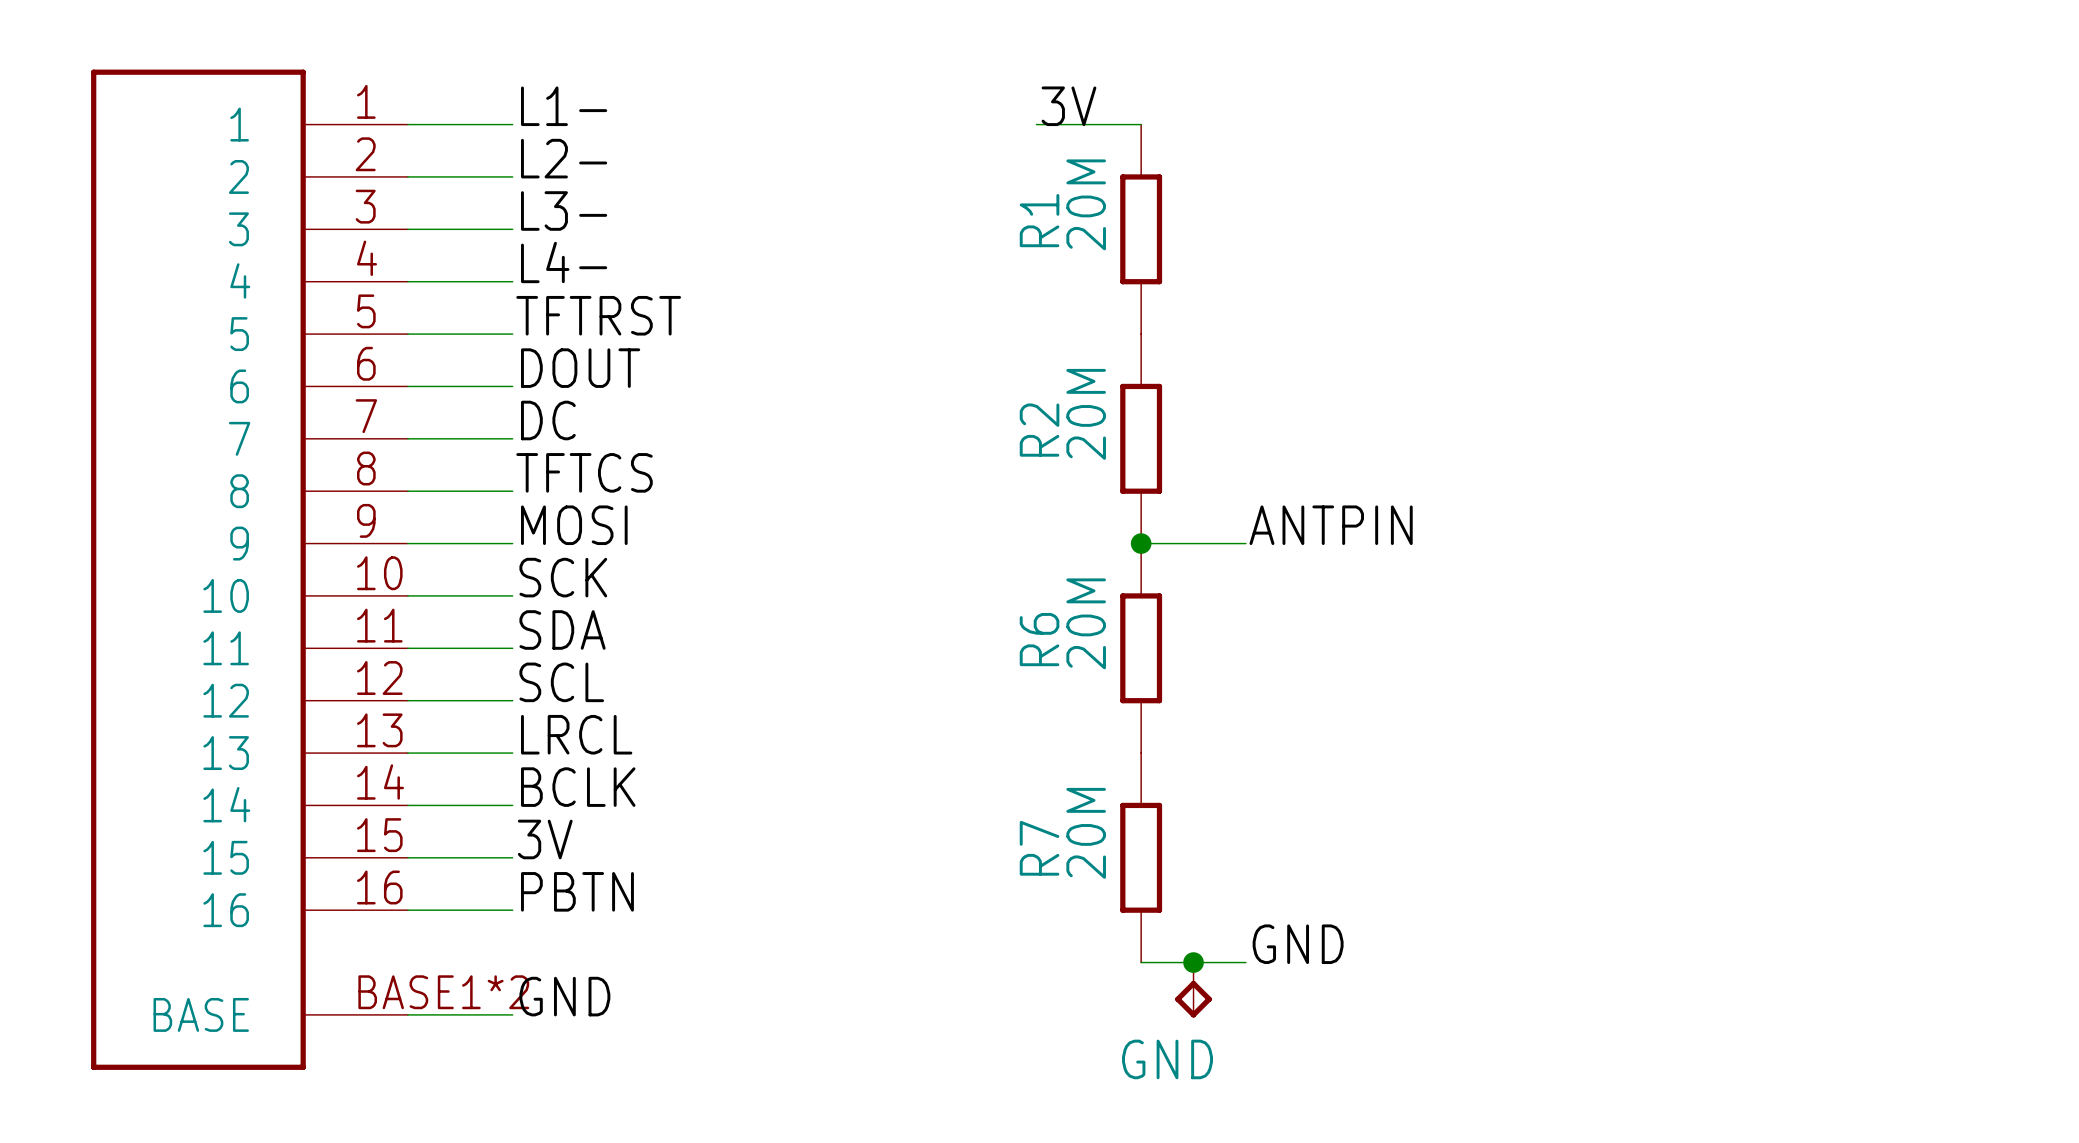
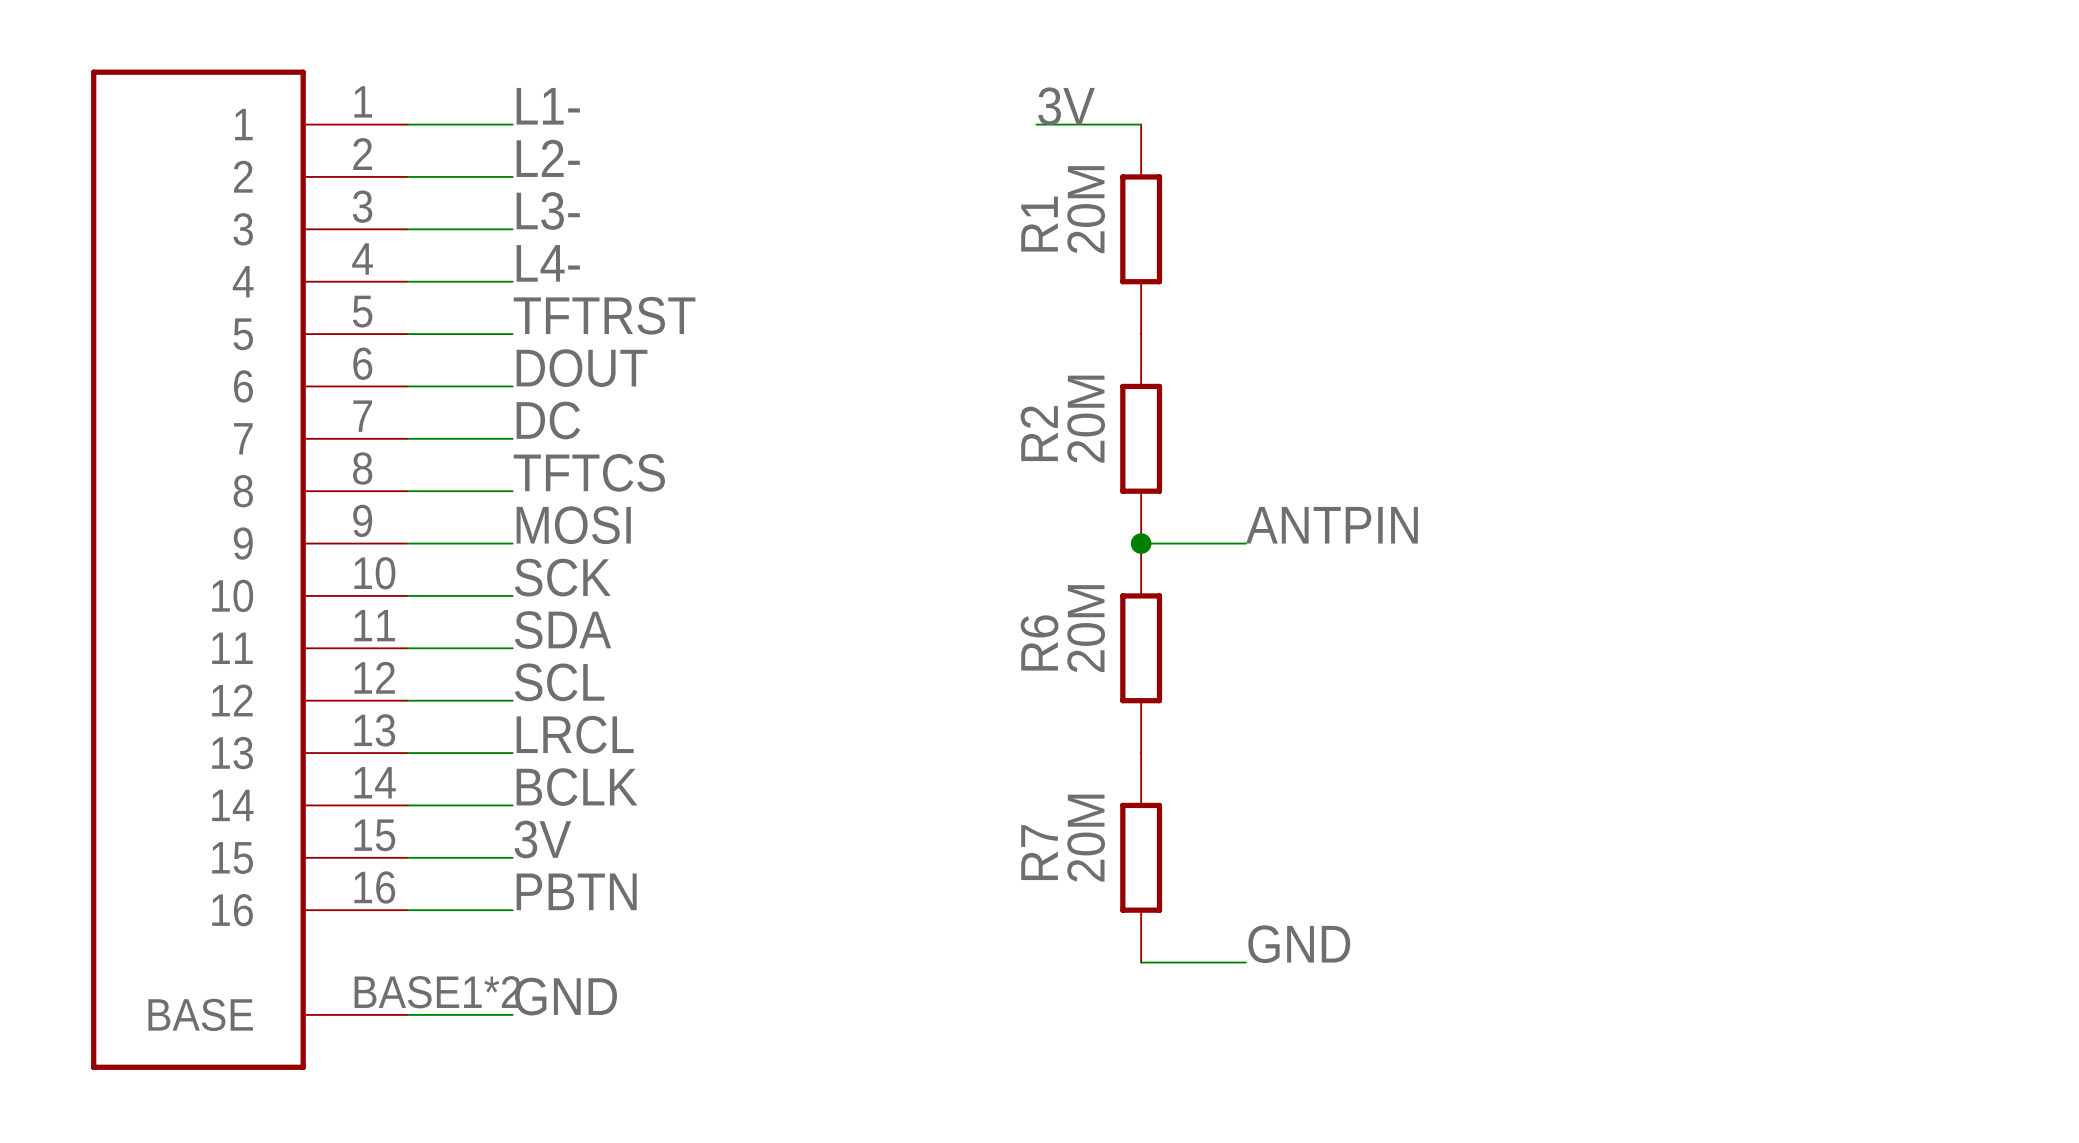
junction: (1193, 962) -> none
GND: (1193, 990) -> none

